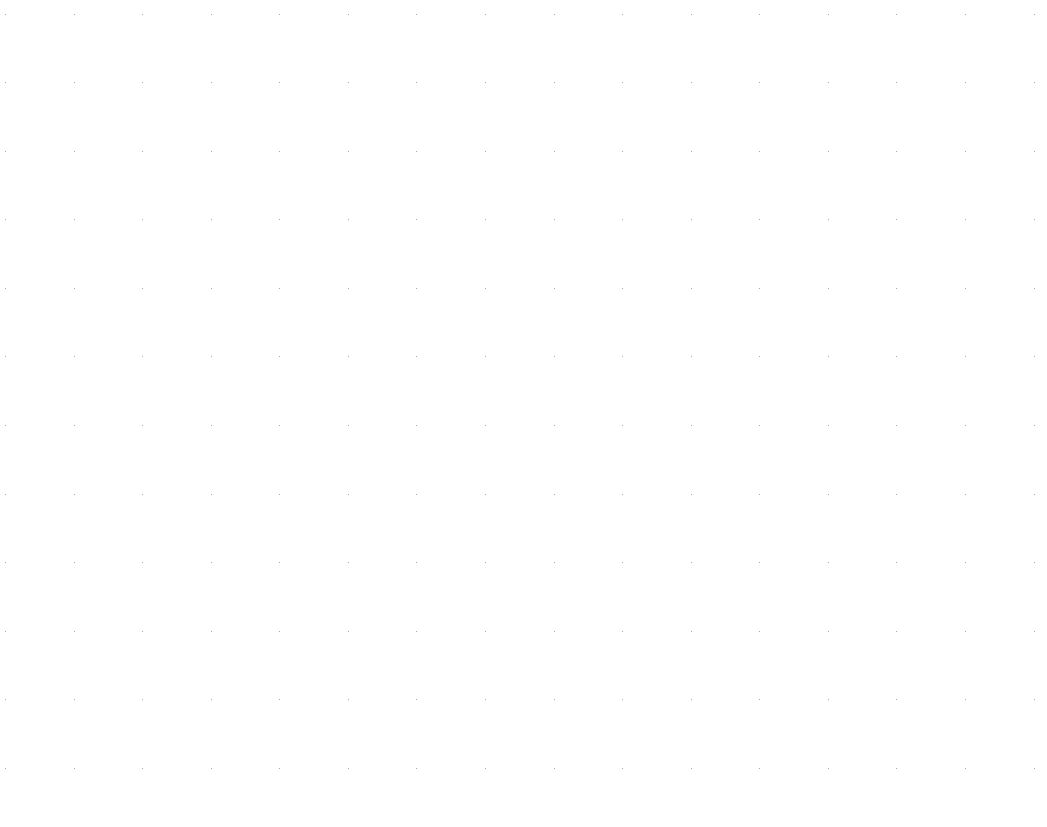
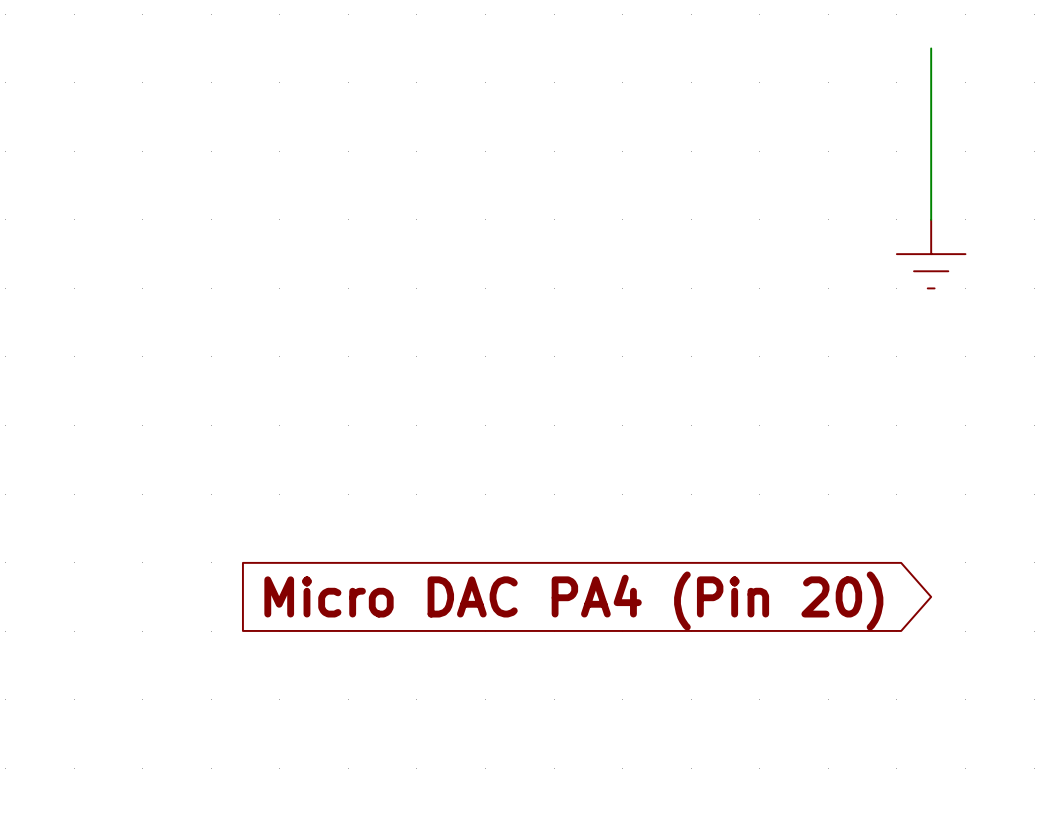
wire: none -> (931, 48) (931, 219)
power symbol: none -> (931, 254)
global label: none -> Micro DAC PA4 (Pin 20) (573, 601)

